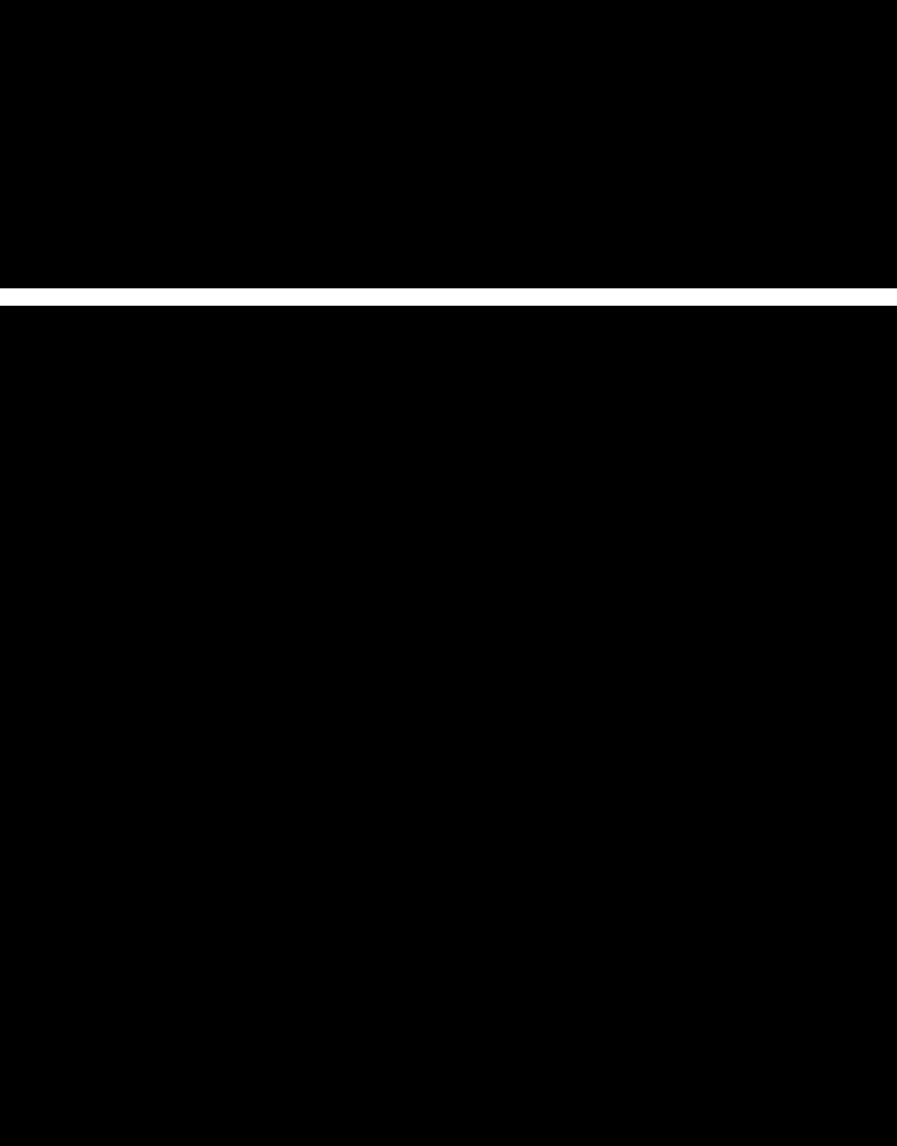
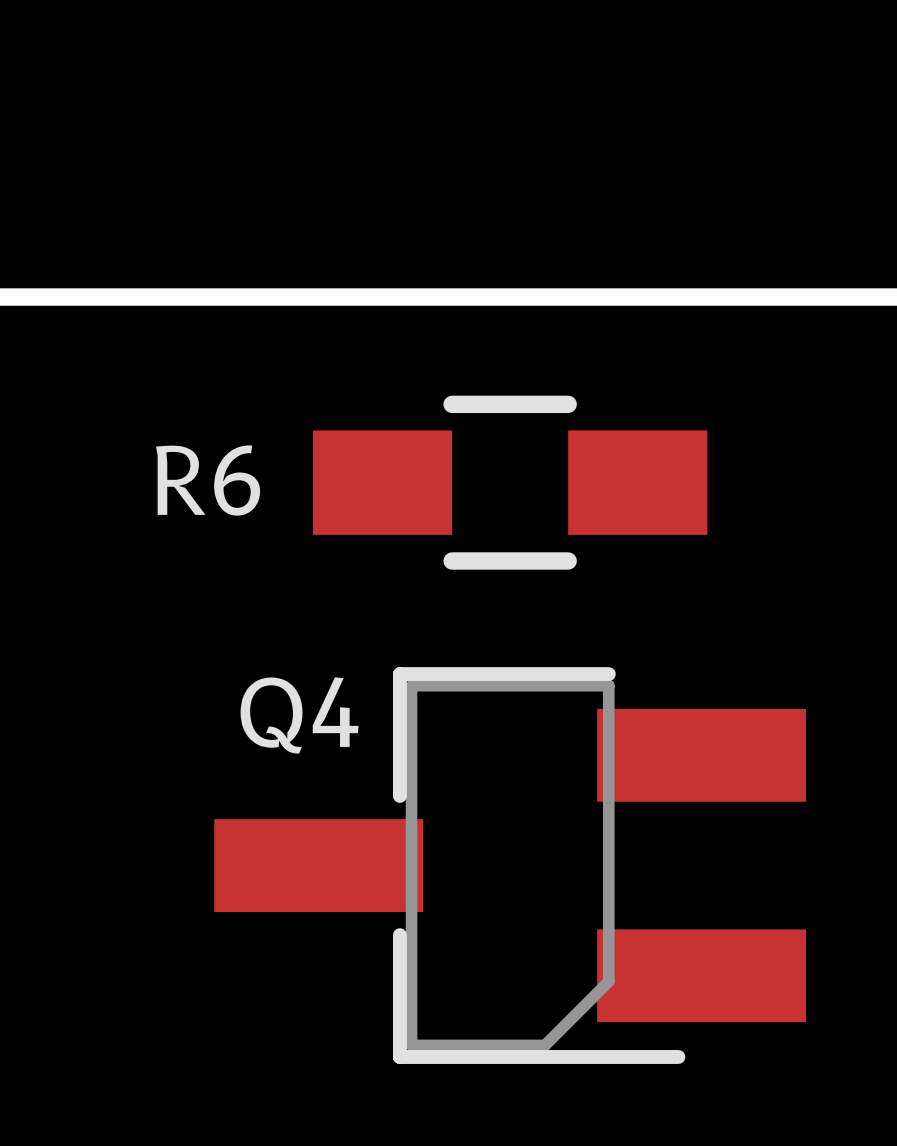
R6: none -> (510, 482)
Q4: none -> (510, 865)

